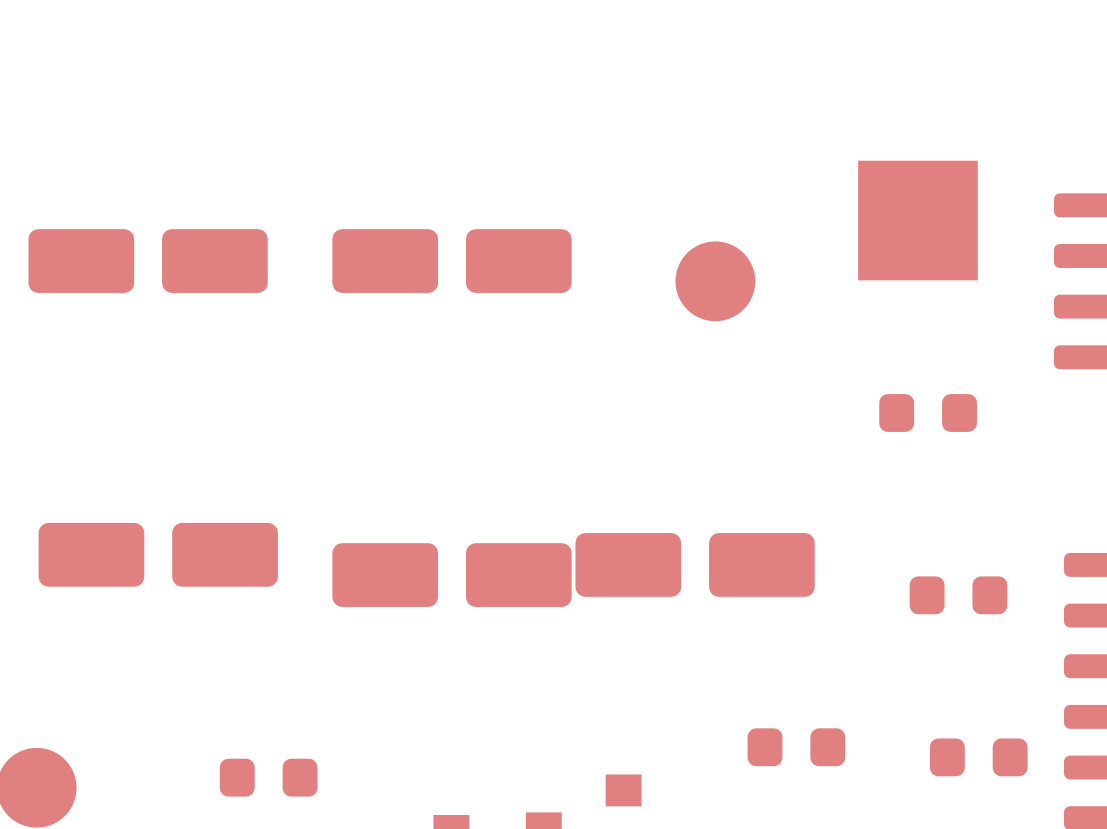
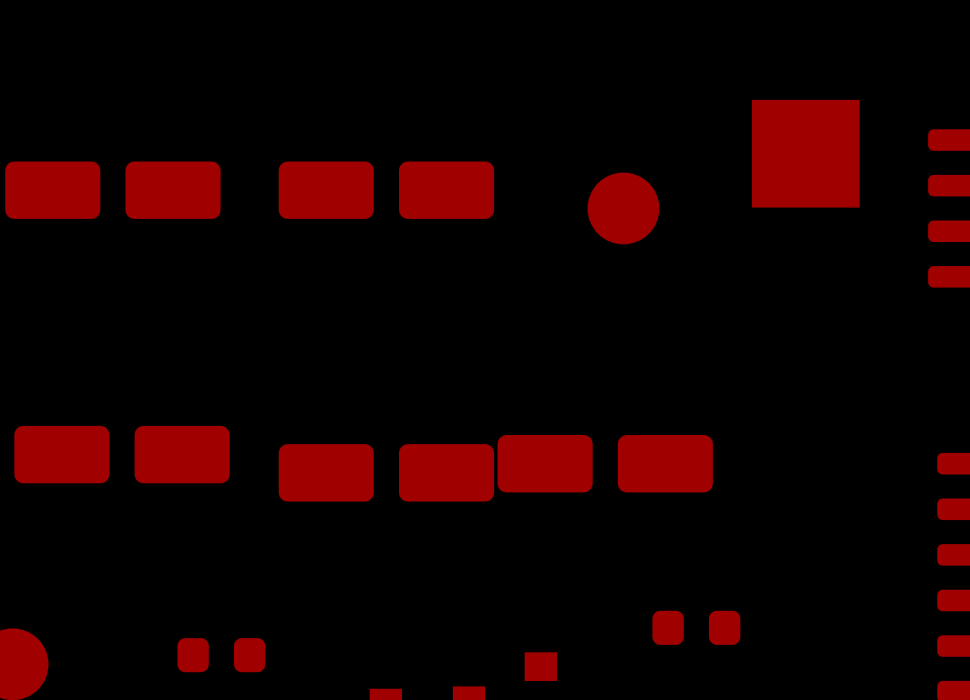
part: (928, 412) -> none
part: (958, 595) -> none
part: (978, 757) -> none

